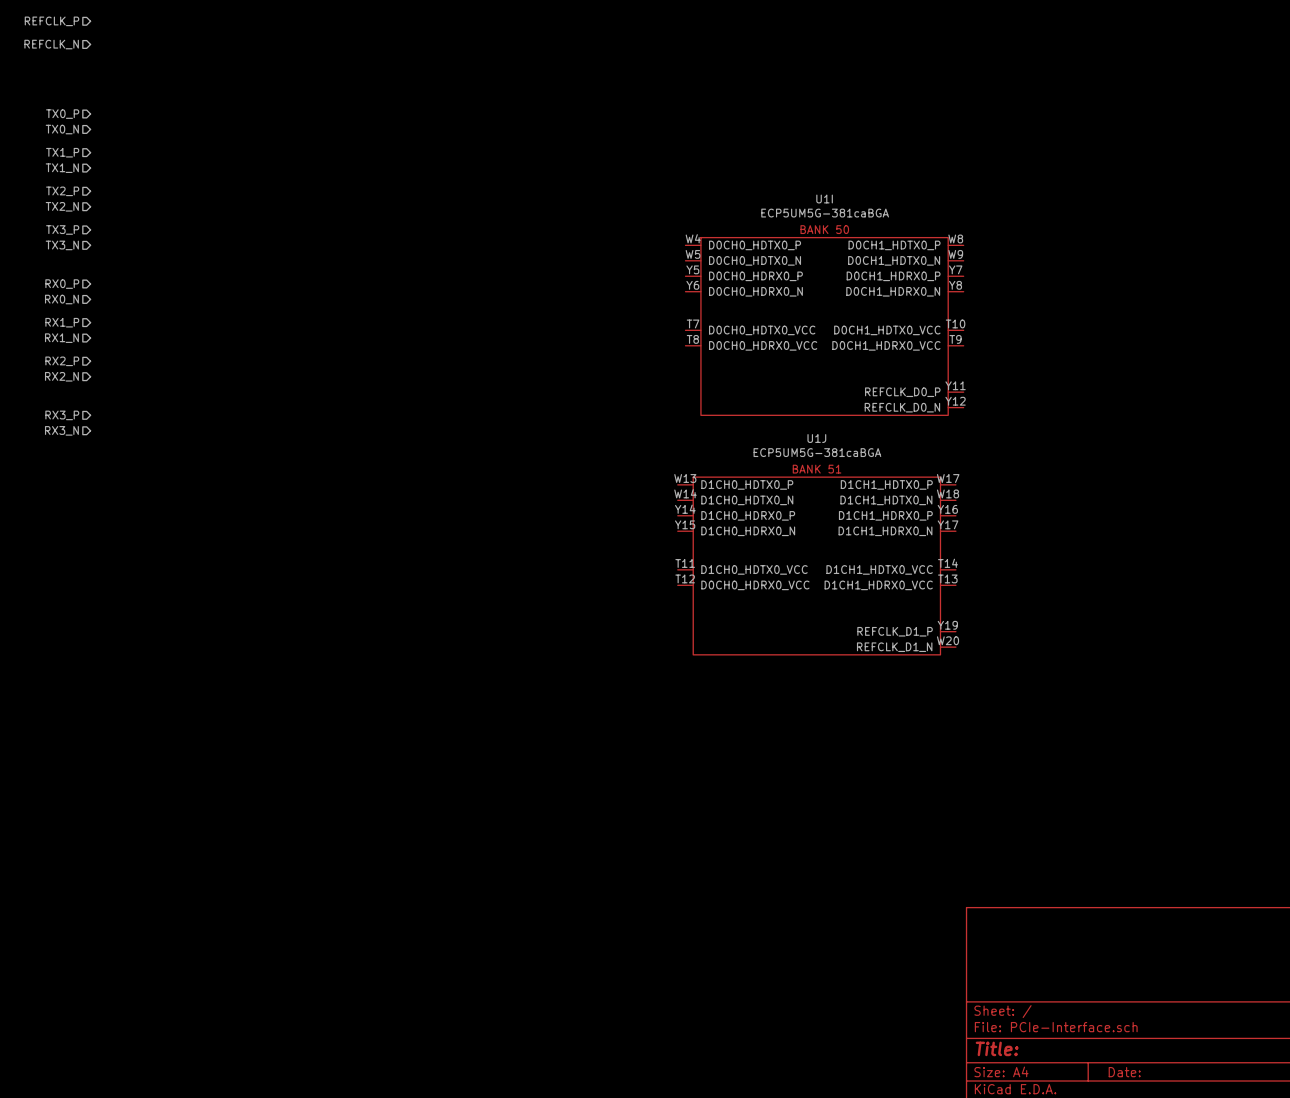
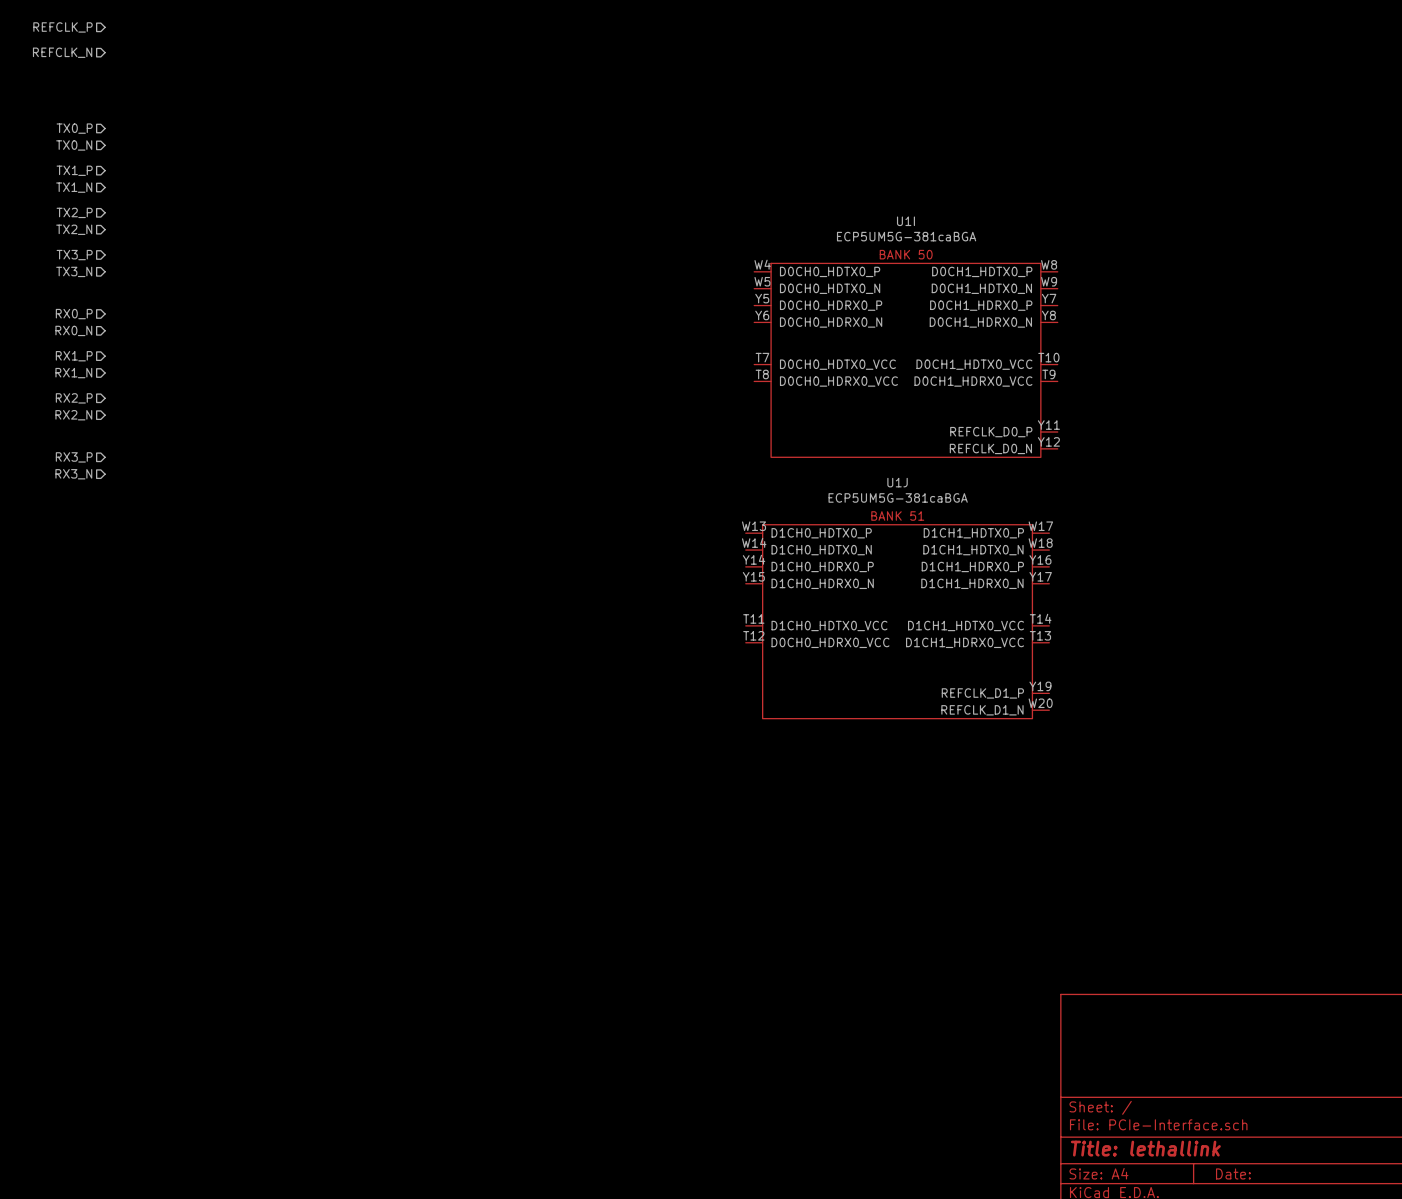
title block: Title: (997, 1048) -> Title: lethallink (1145, 1148)

